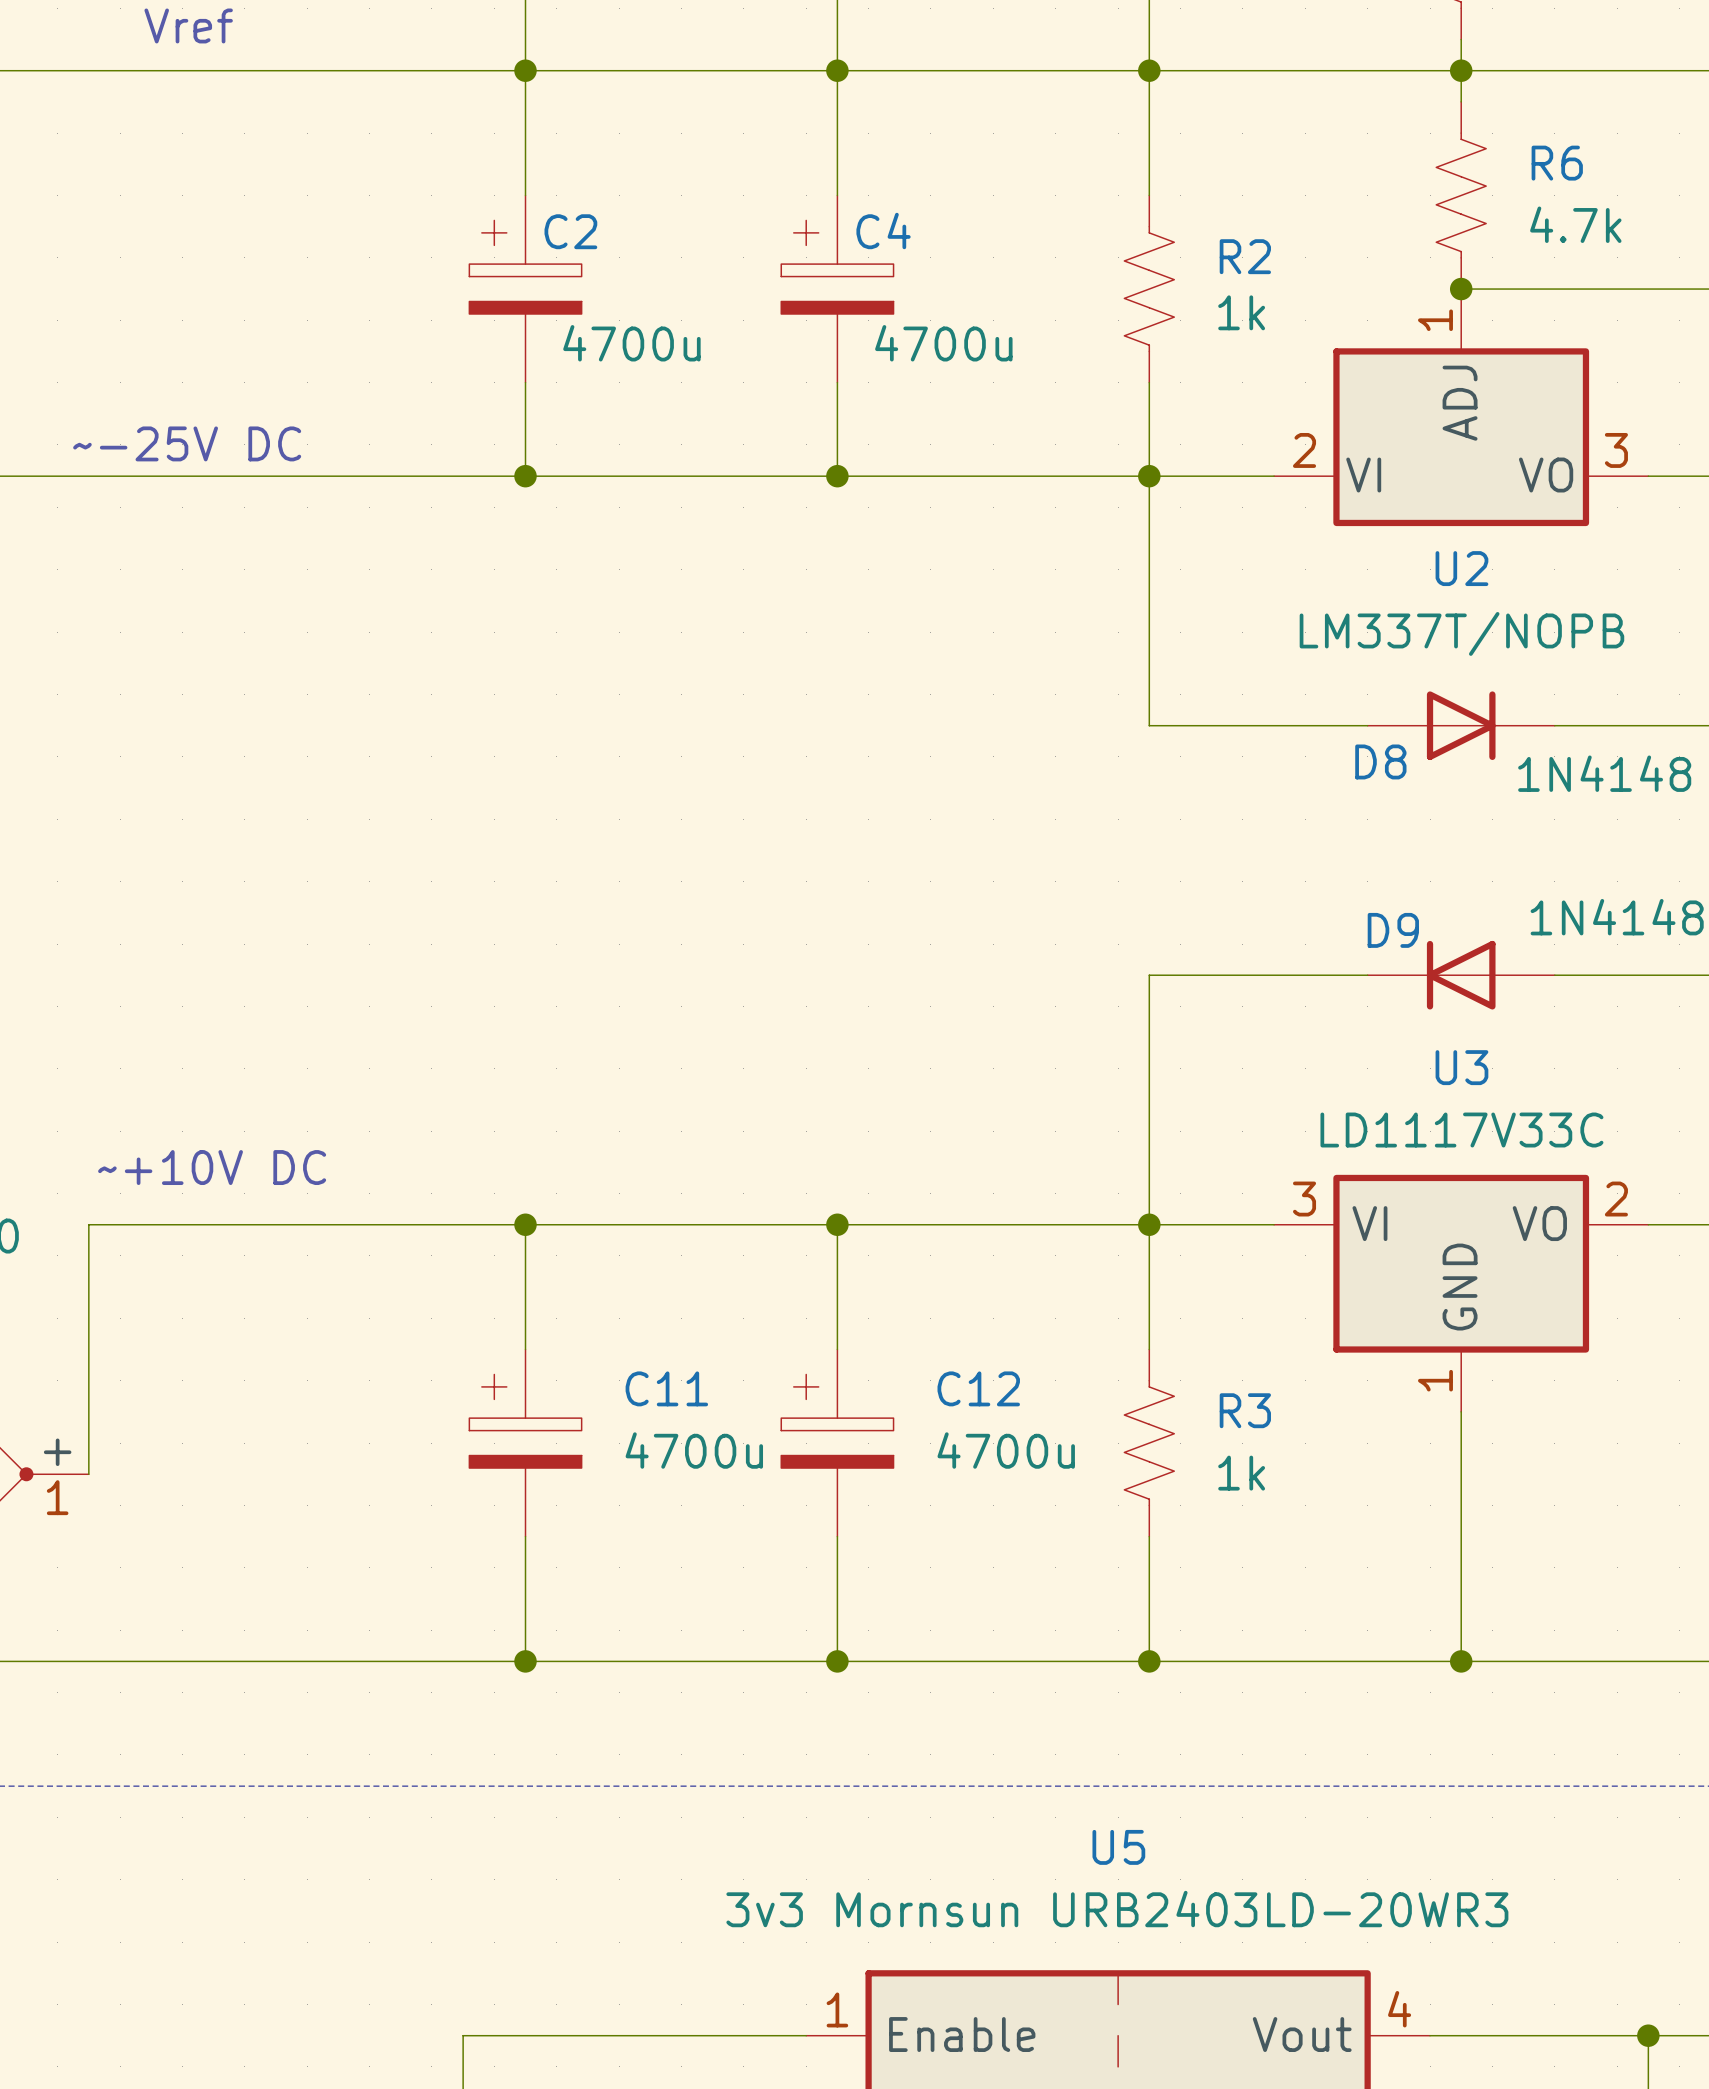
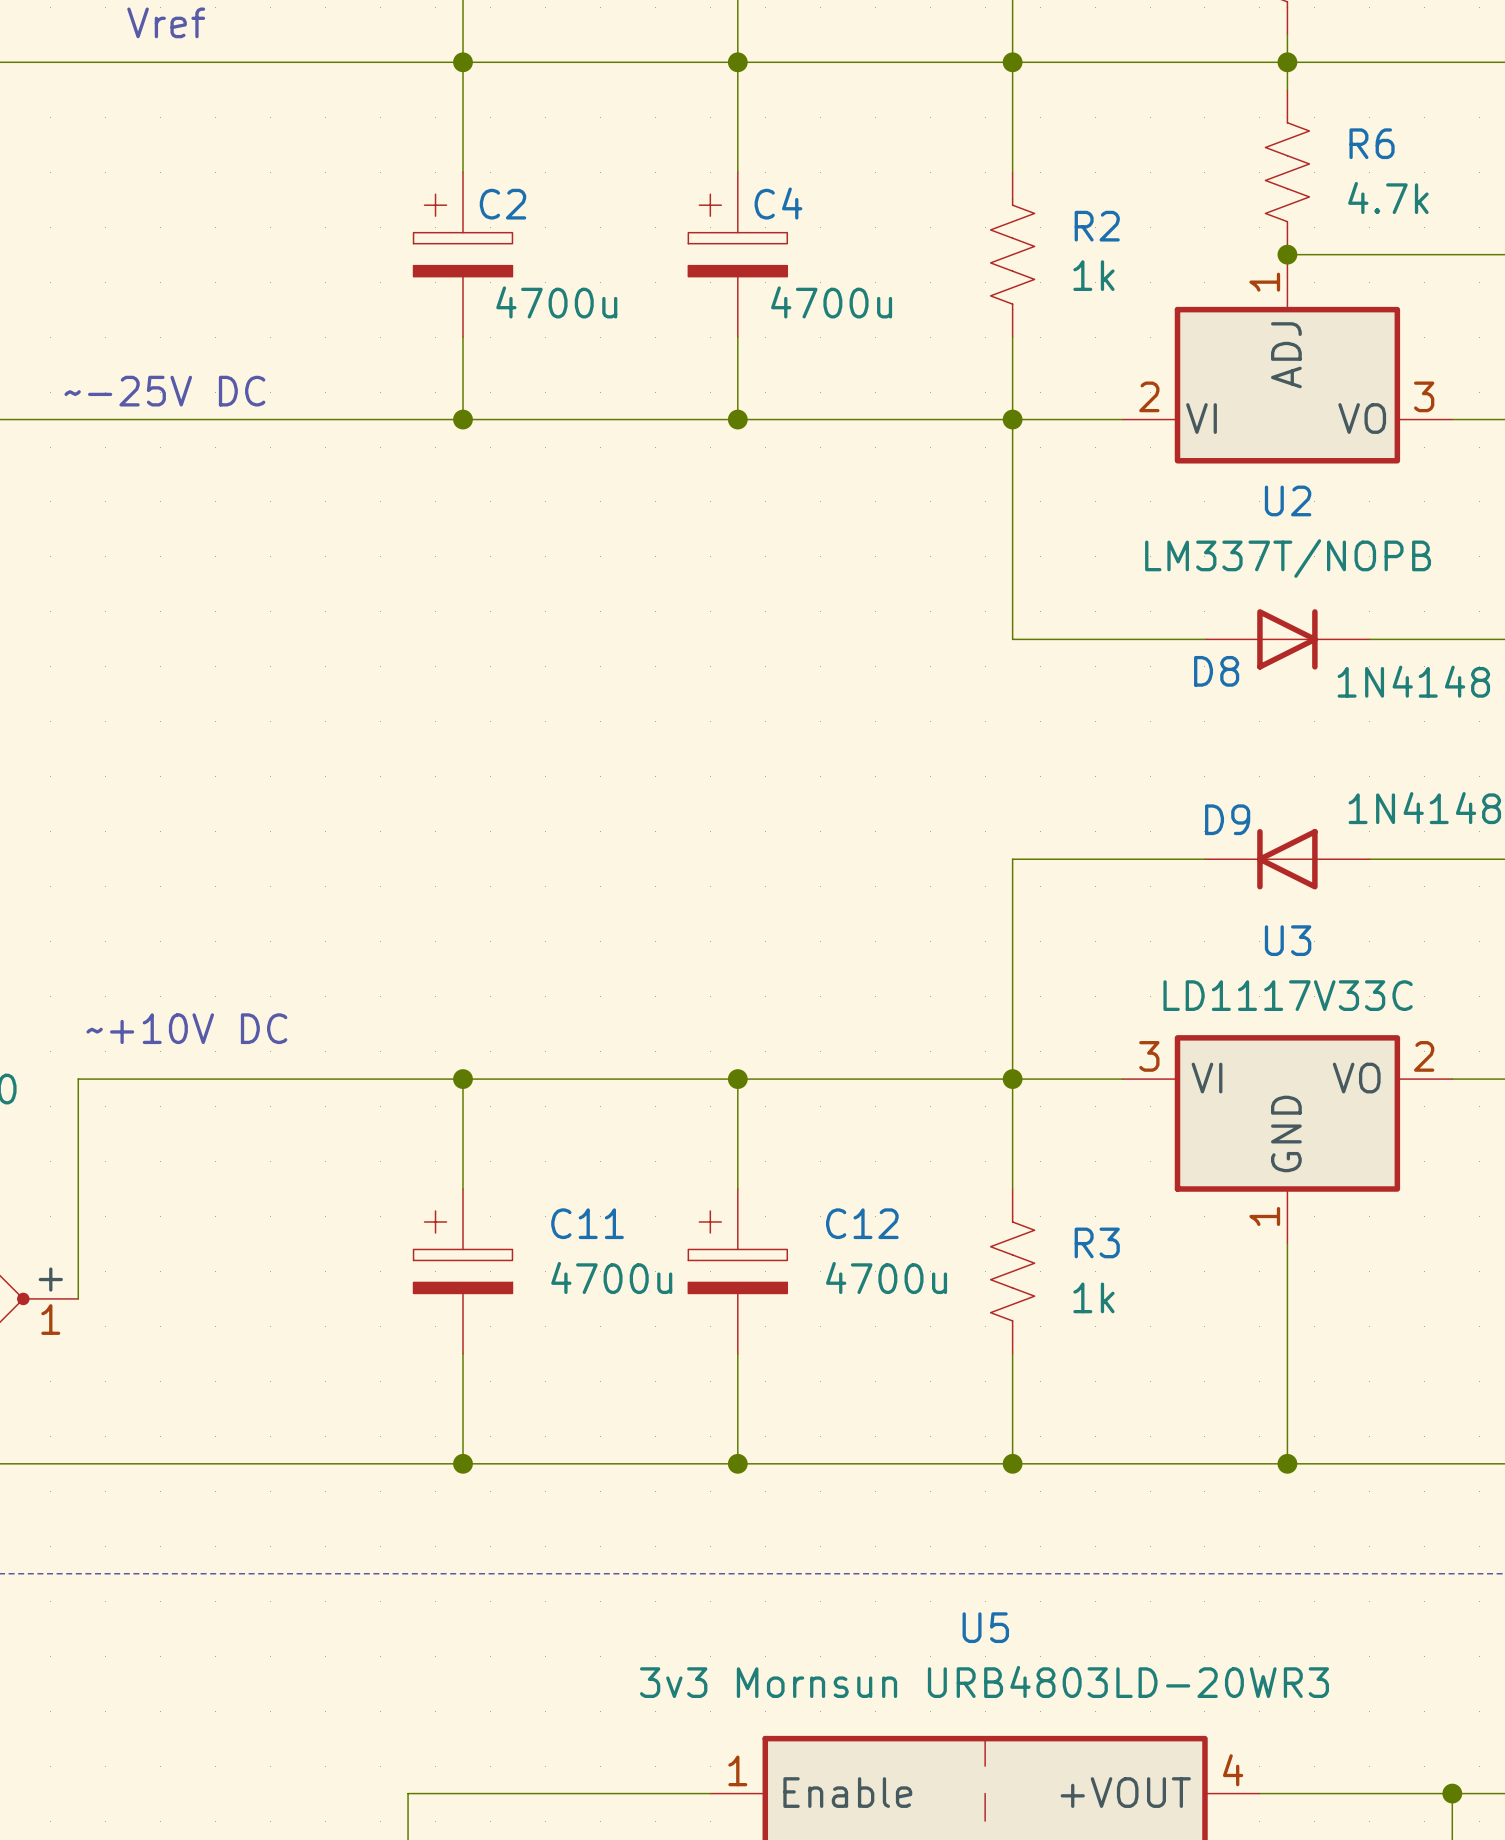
U5 value: 3v3 Mornsun URB2403LD-20WR3 (1117, 1909) -> 3v3 Mornsun URB4803LD-20WR3 (984, 1681)
U5 pin name: Vout (1302, 2034) -> +VOUT (1125, 1792)

